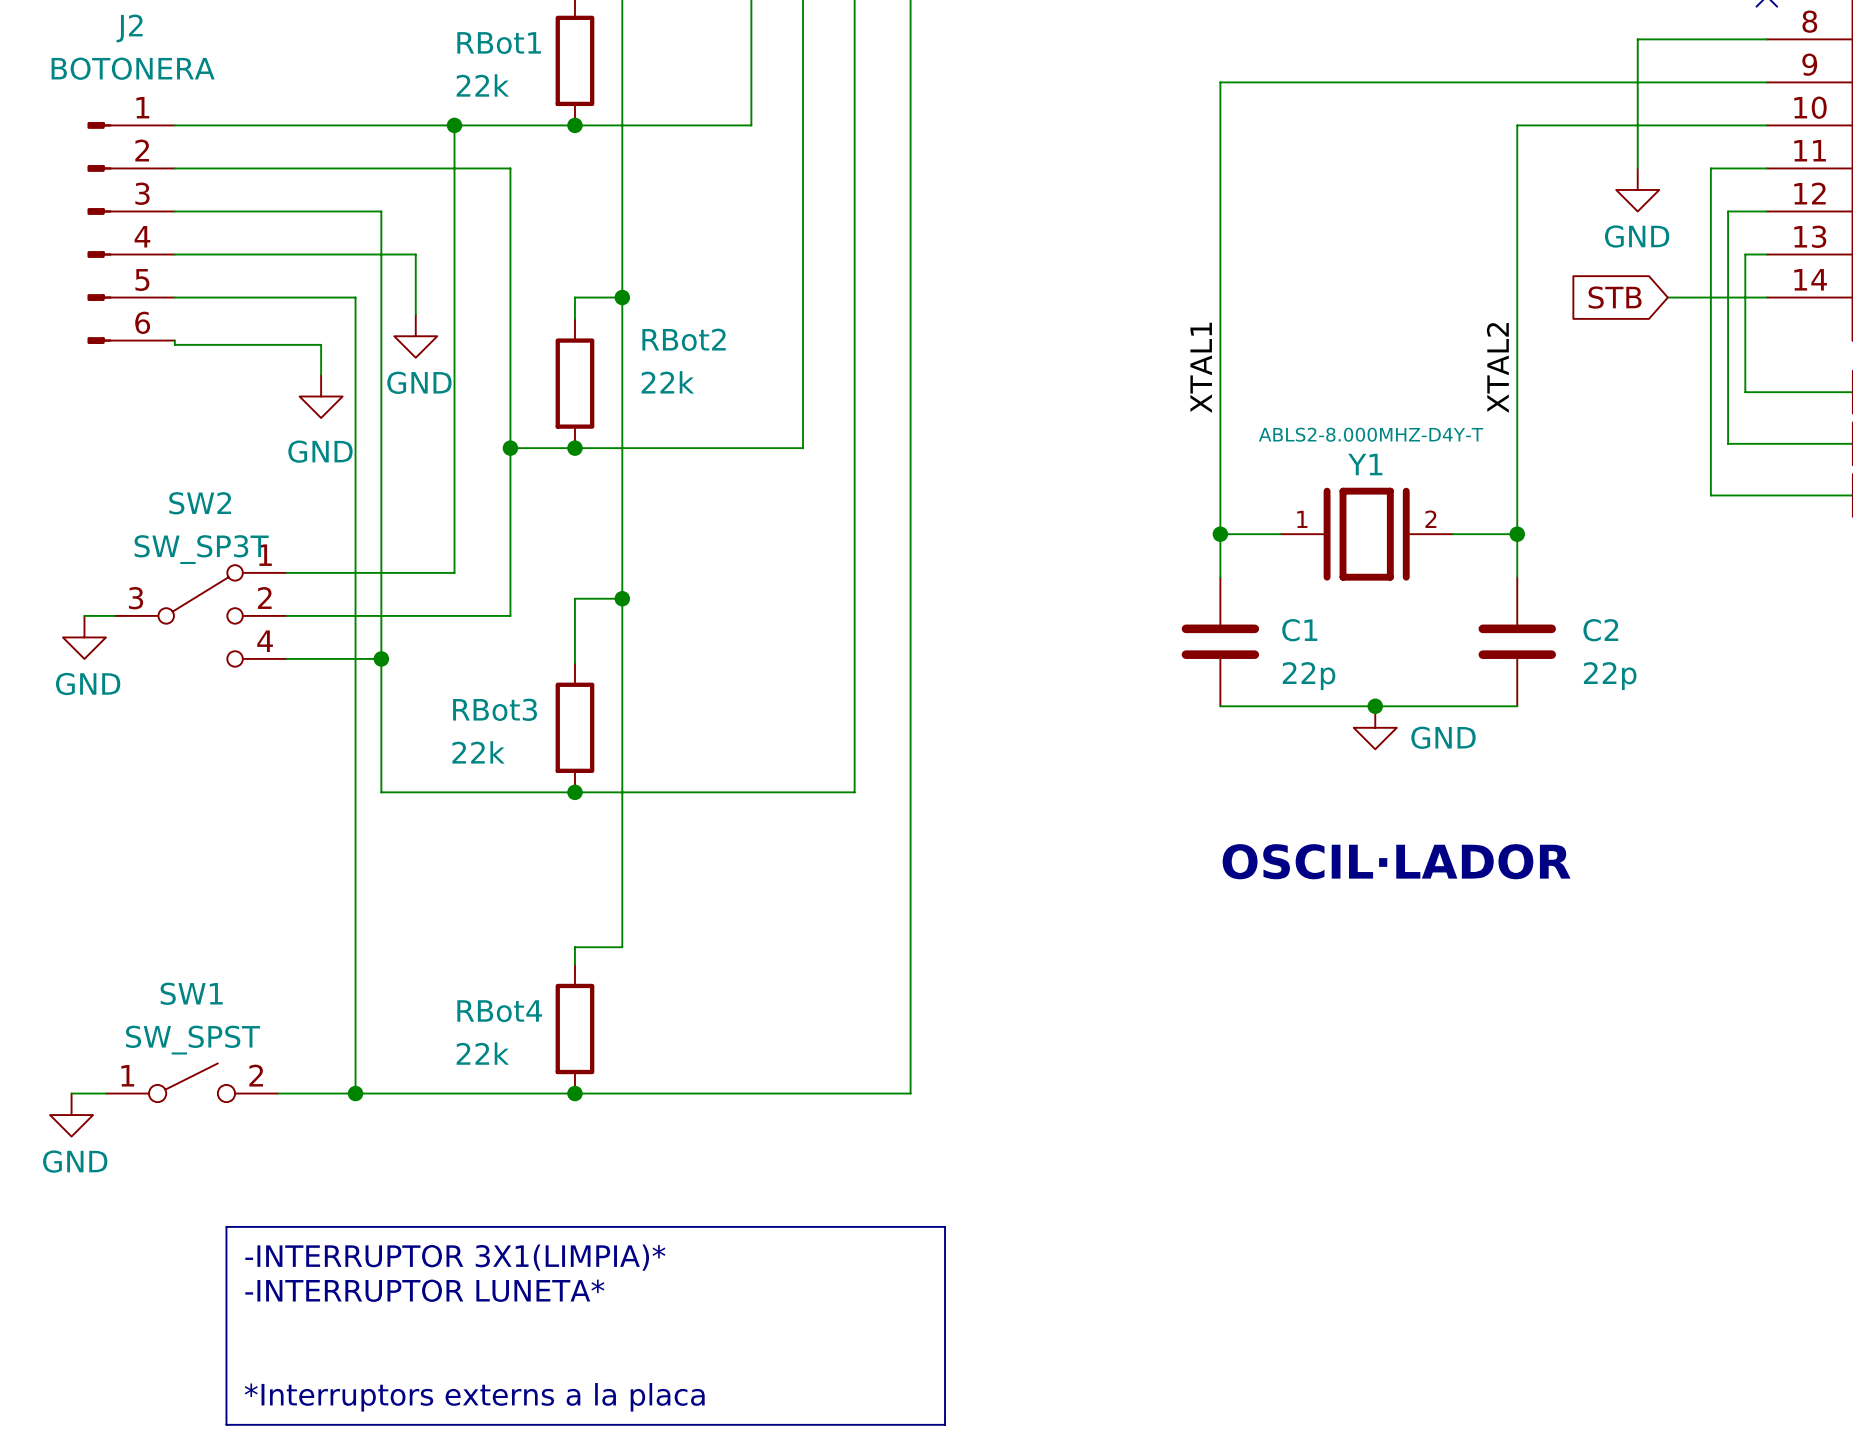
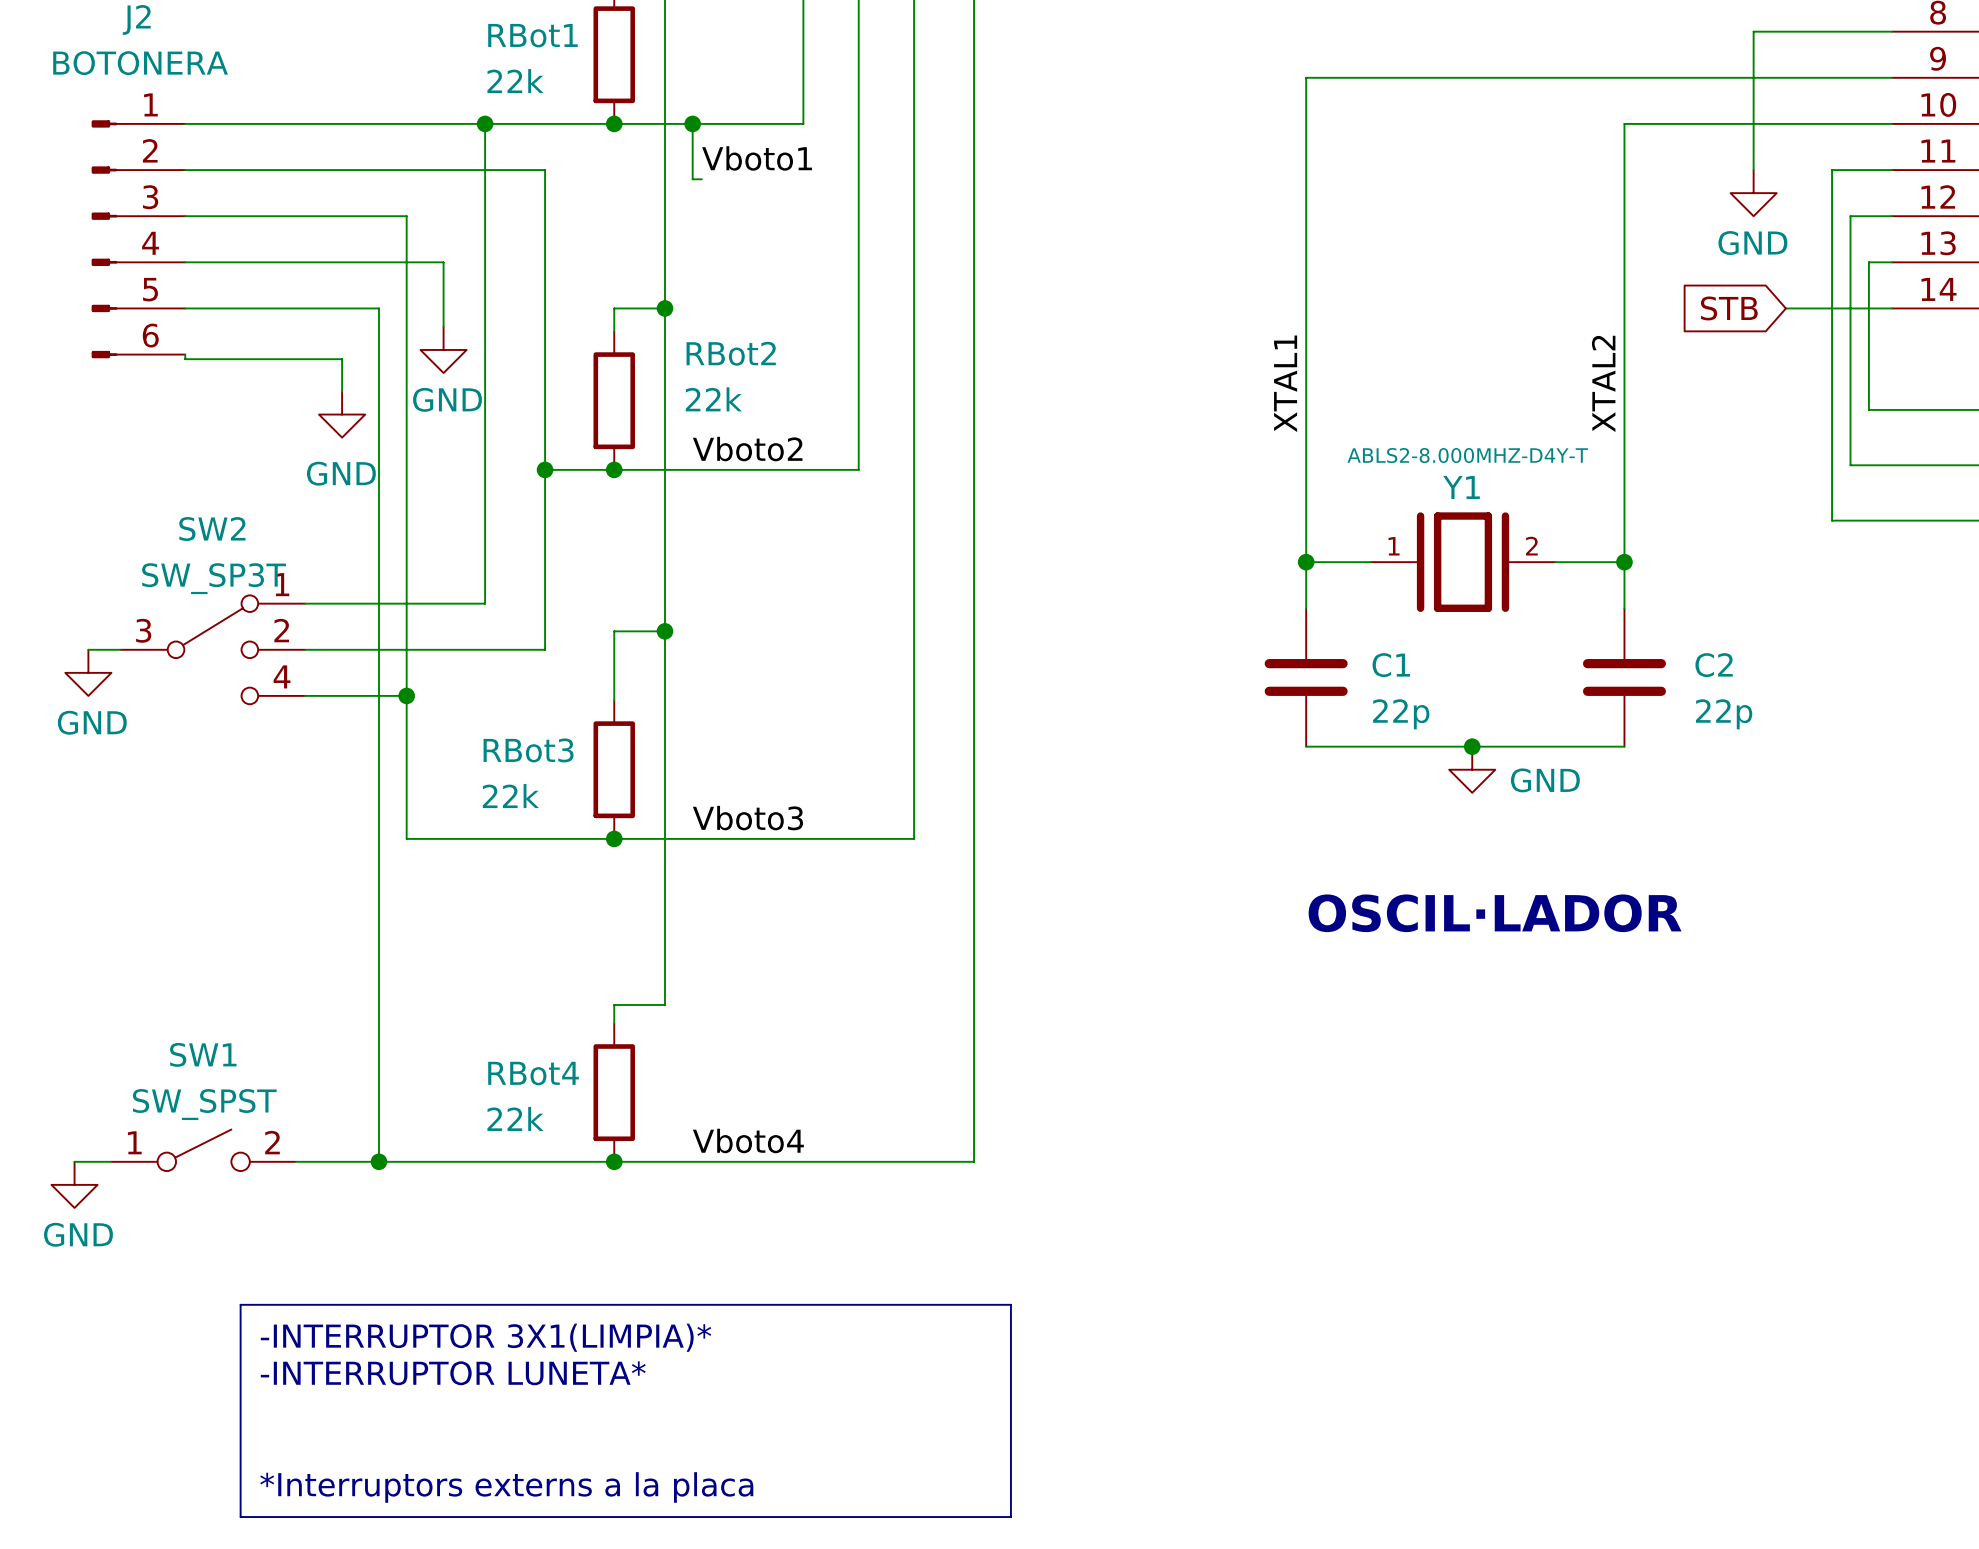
wire: none -> (692, 123) (692, 179) (701, 179)
junction: none -> (692, 123)
label: none -> Vboto1 (757, 158)
label: none -> Vboto2 (747, 449)
label: none -> Vboto3 (748, 818)
label: none -> Vboto4 (748, 1140)

